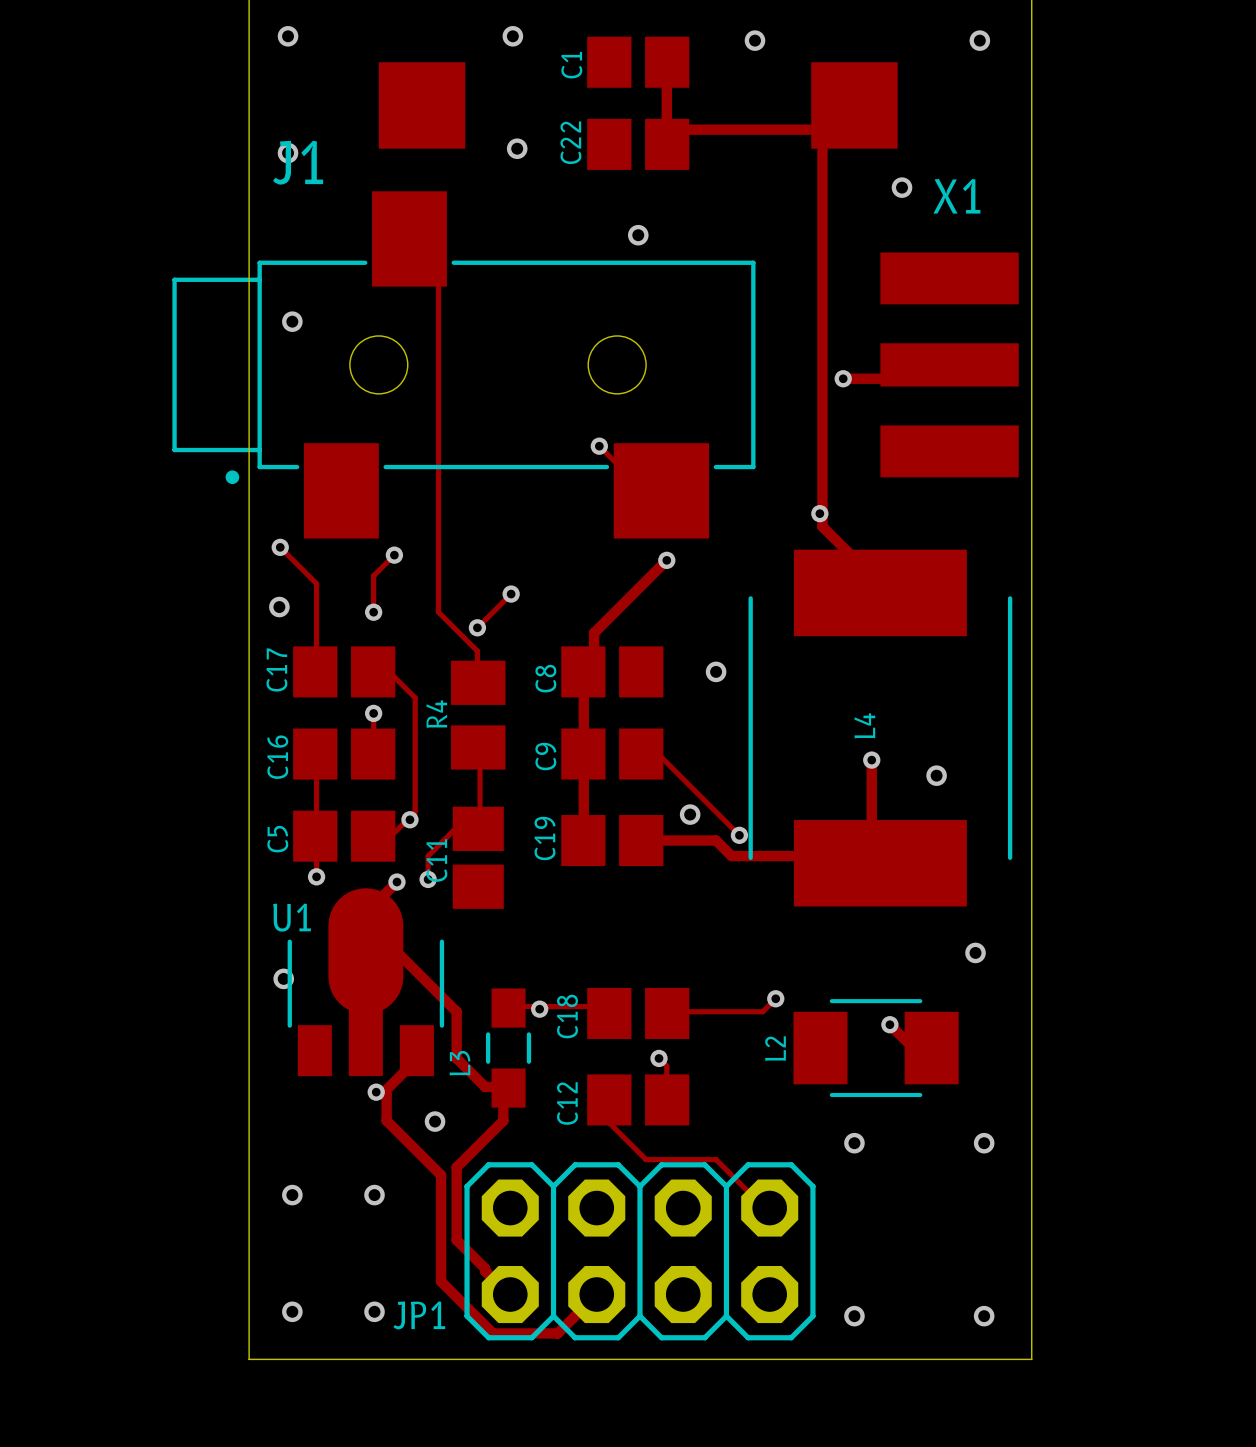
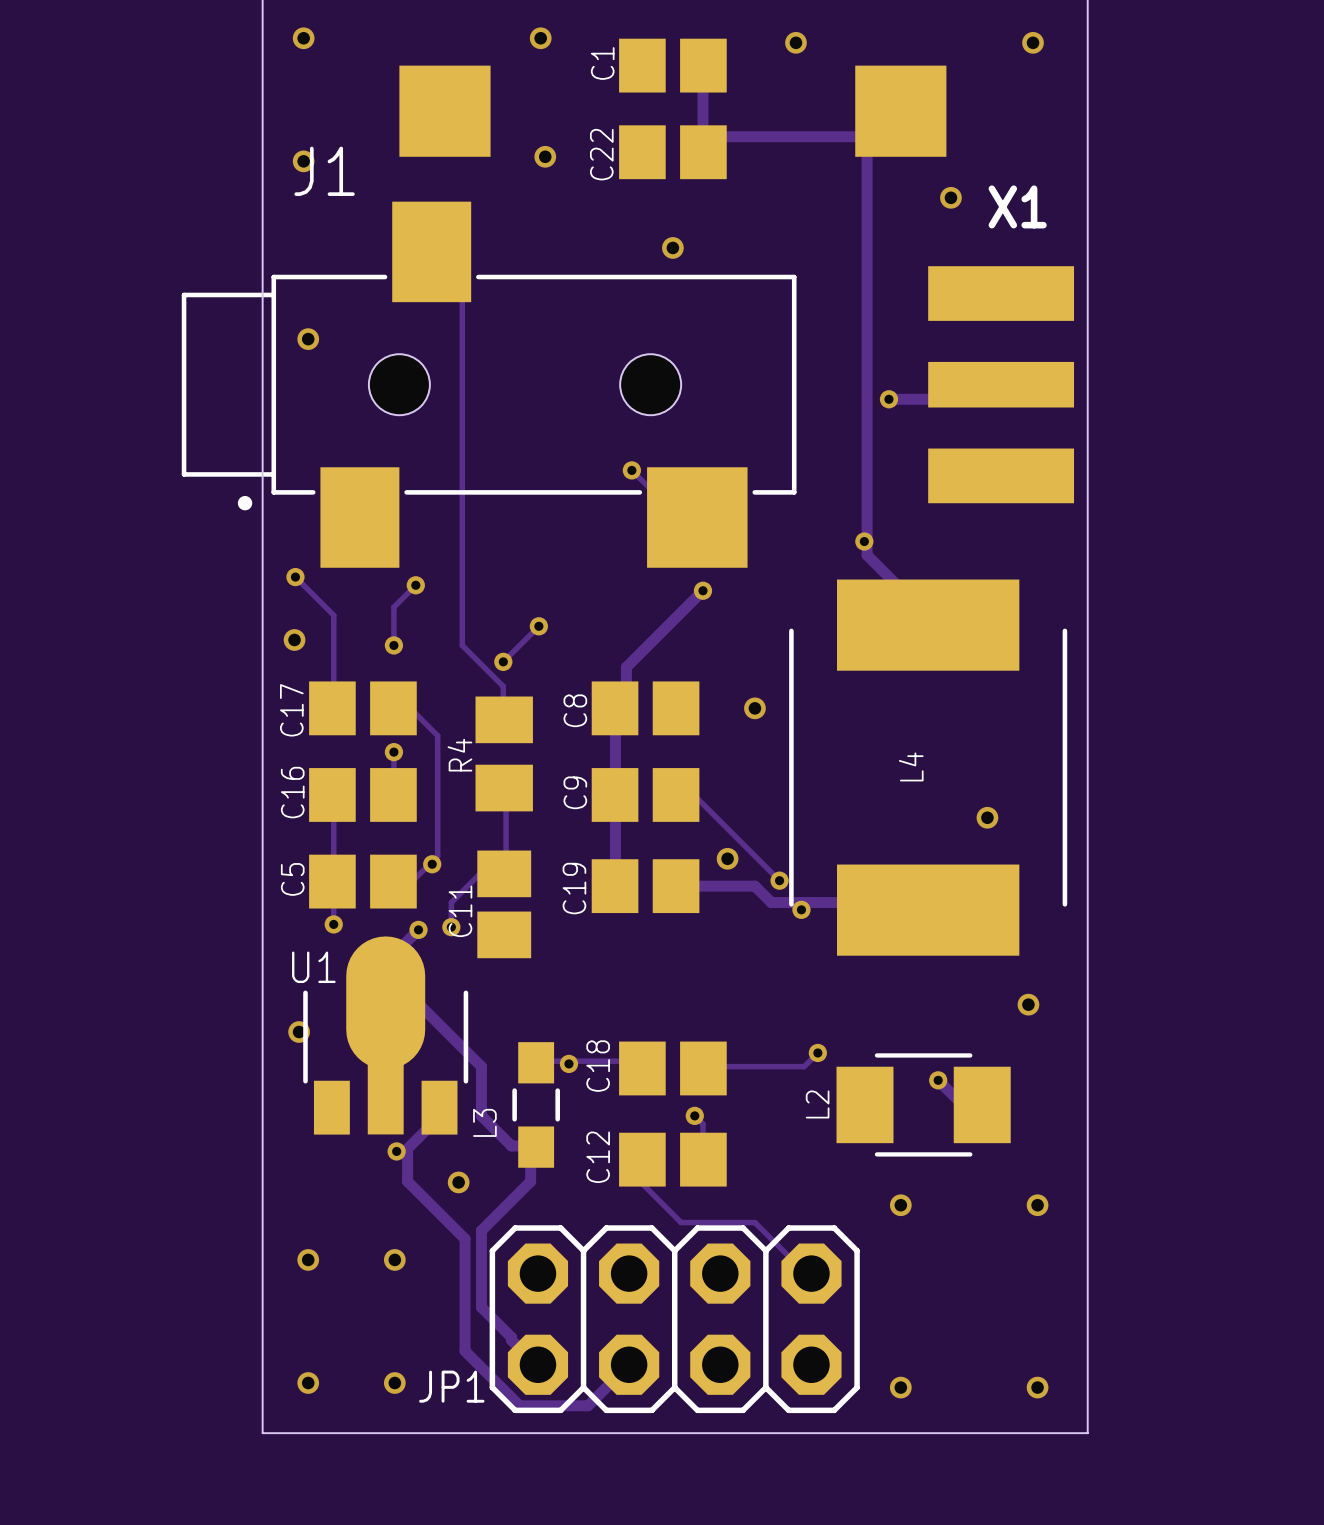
track: (871, 760) (871, 853) (880, 863) -> none
via position: (871, 760) -> (801, 909)

